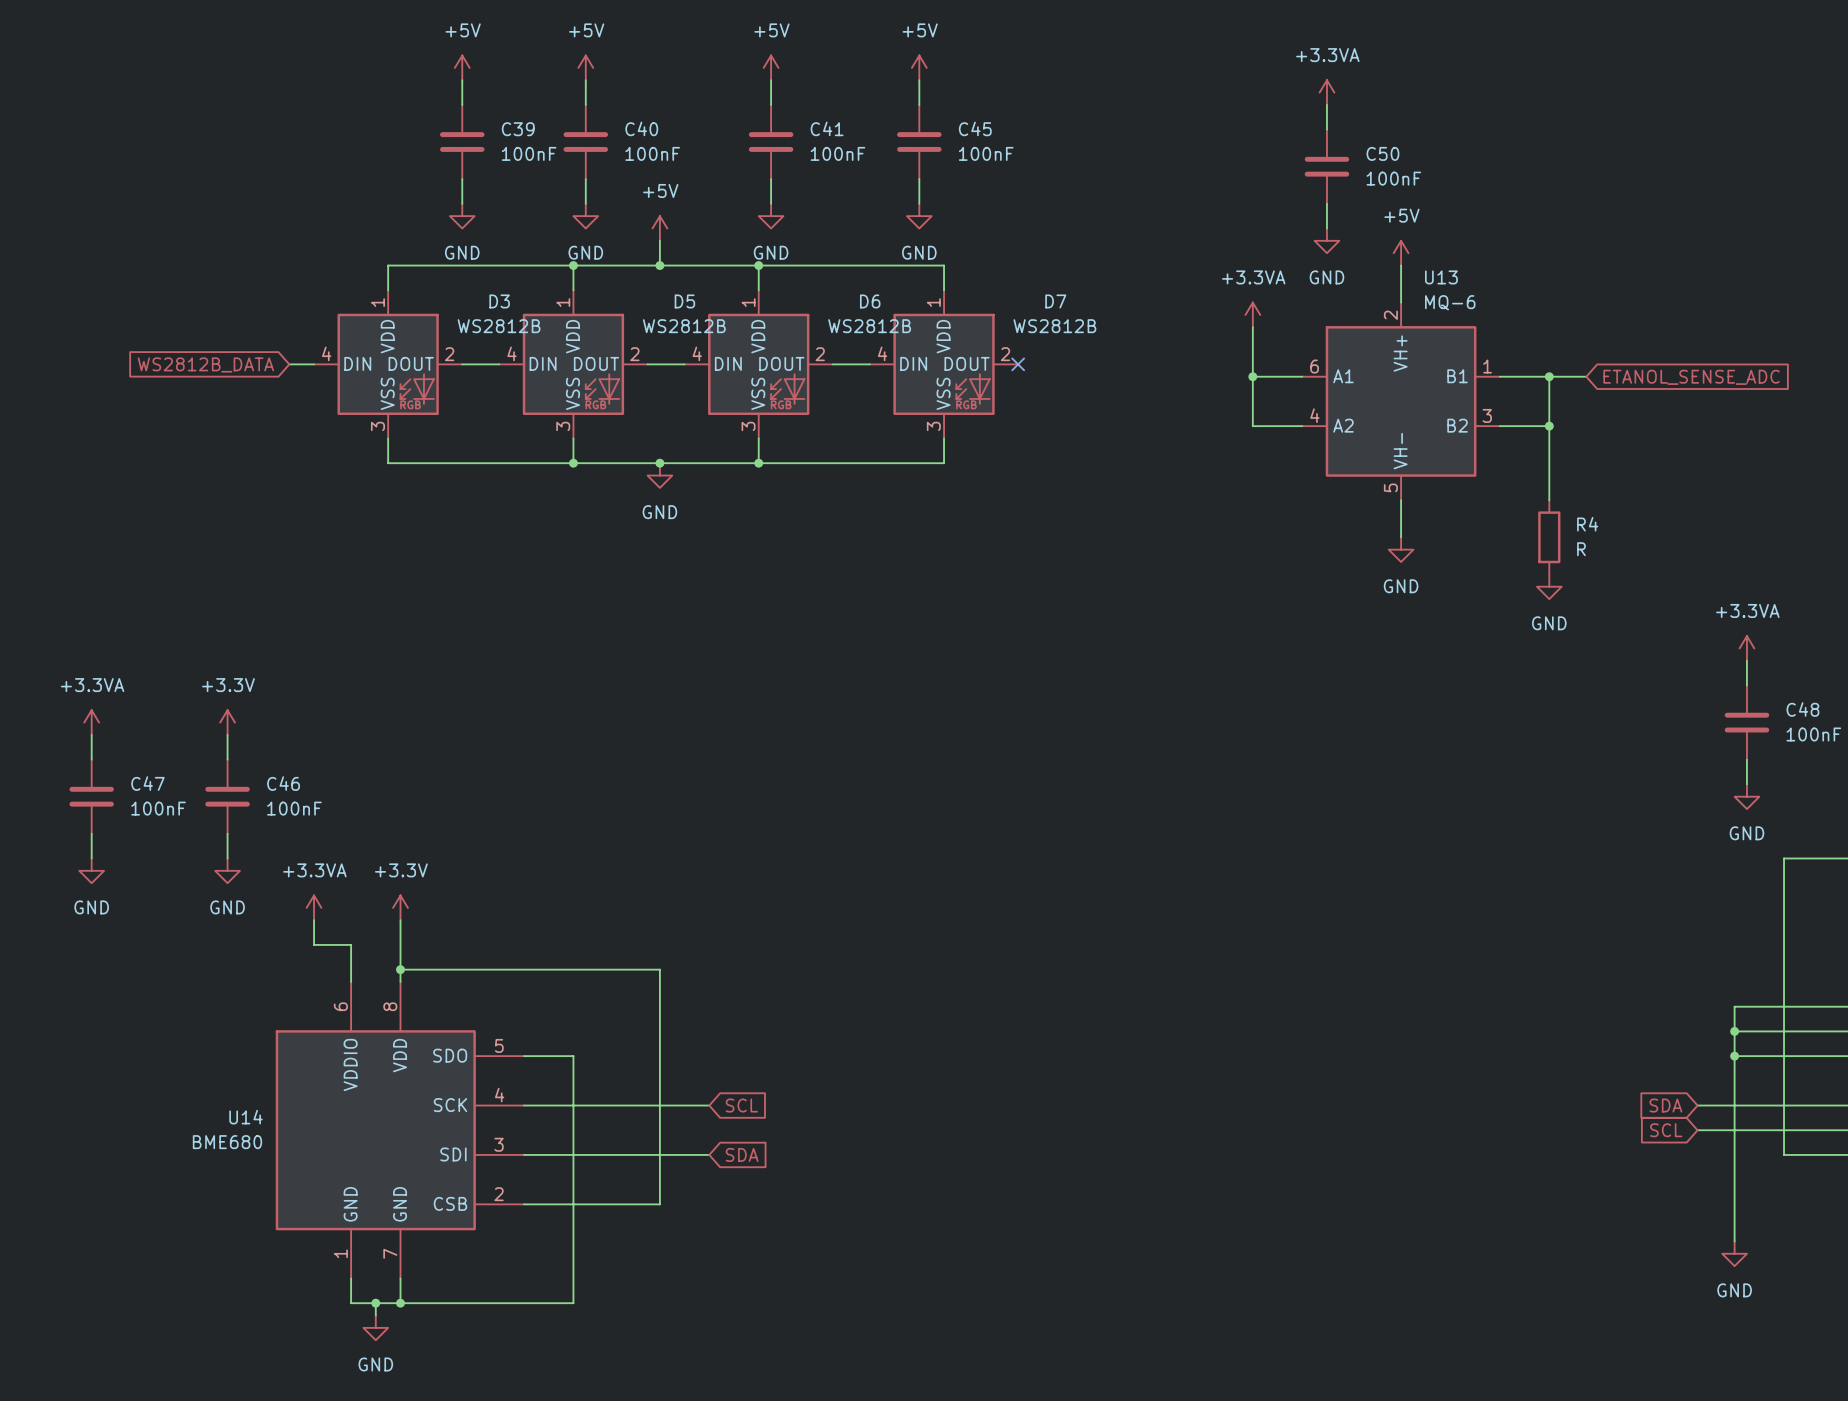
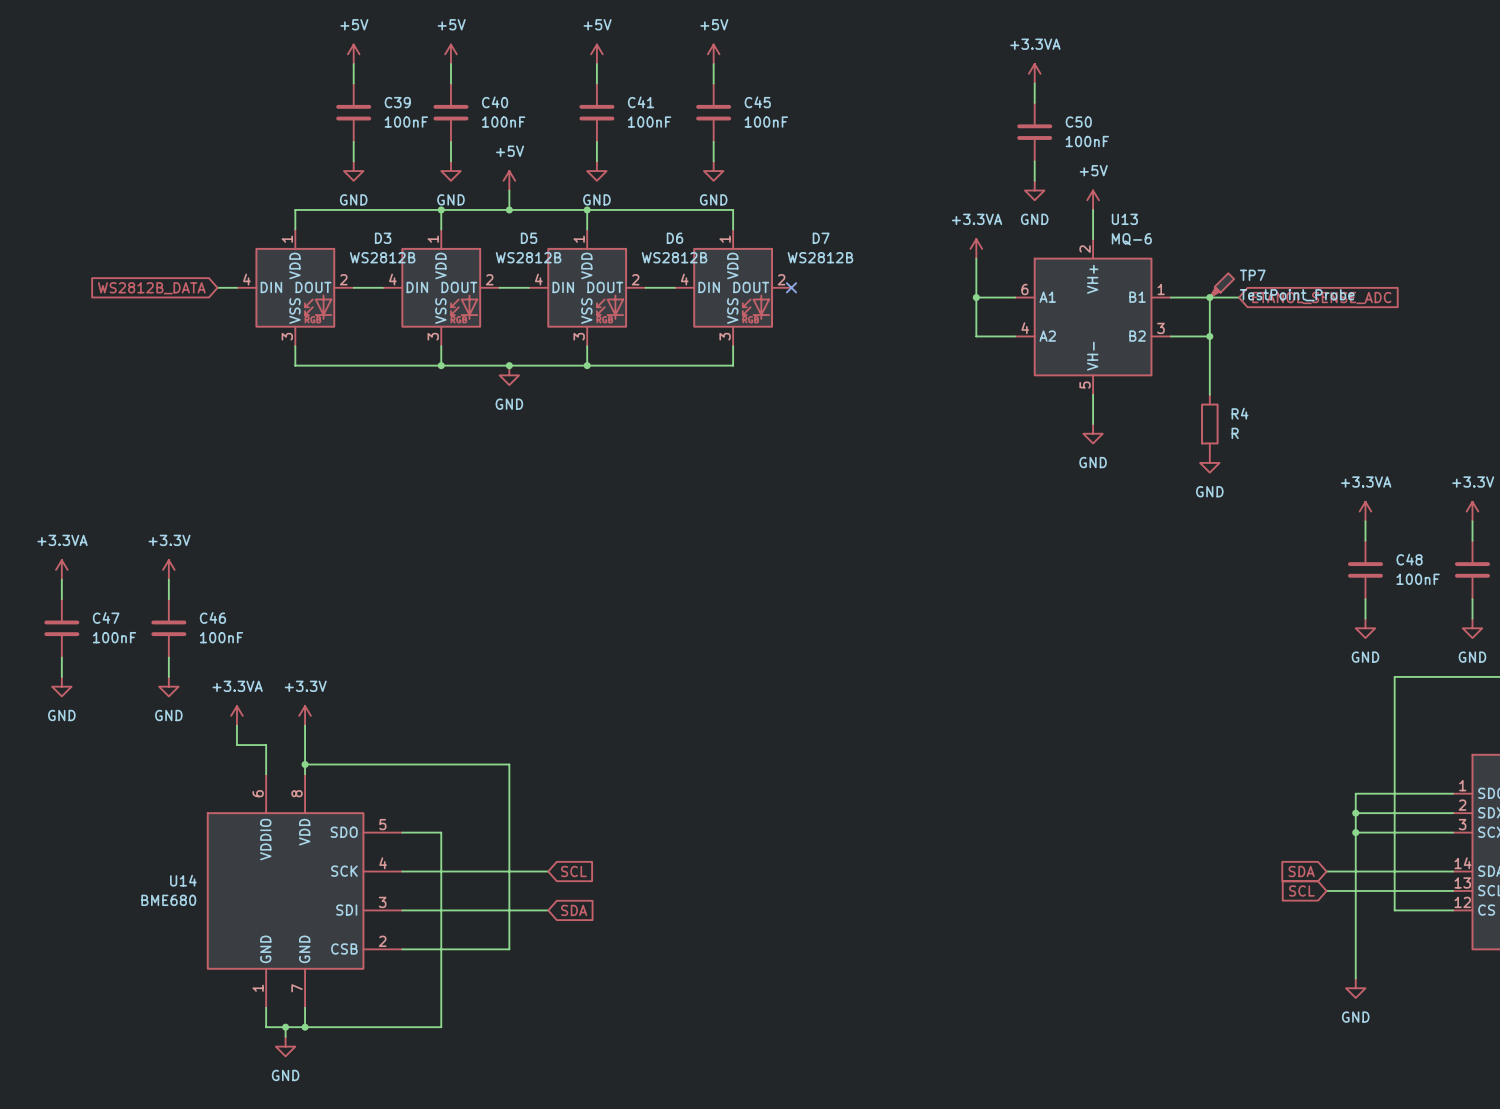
TP7: none -> TestPoint_Probe (1221, 285)

